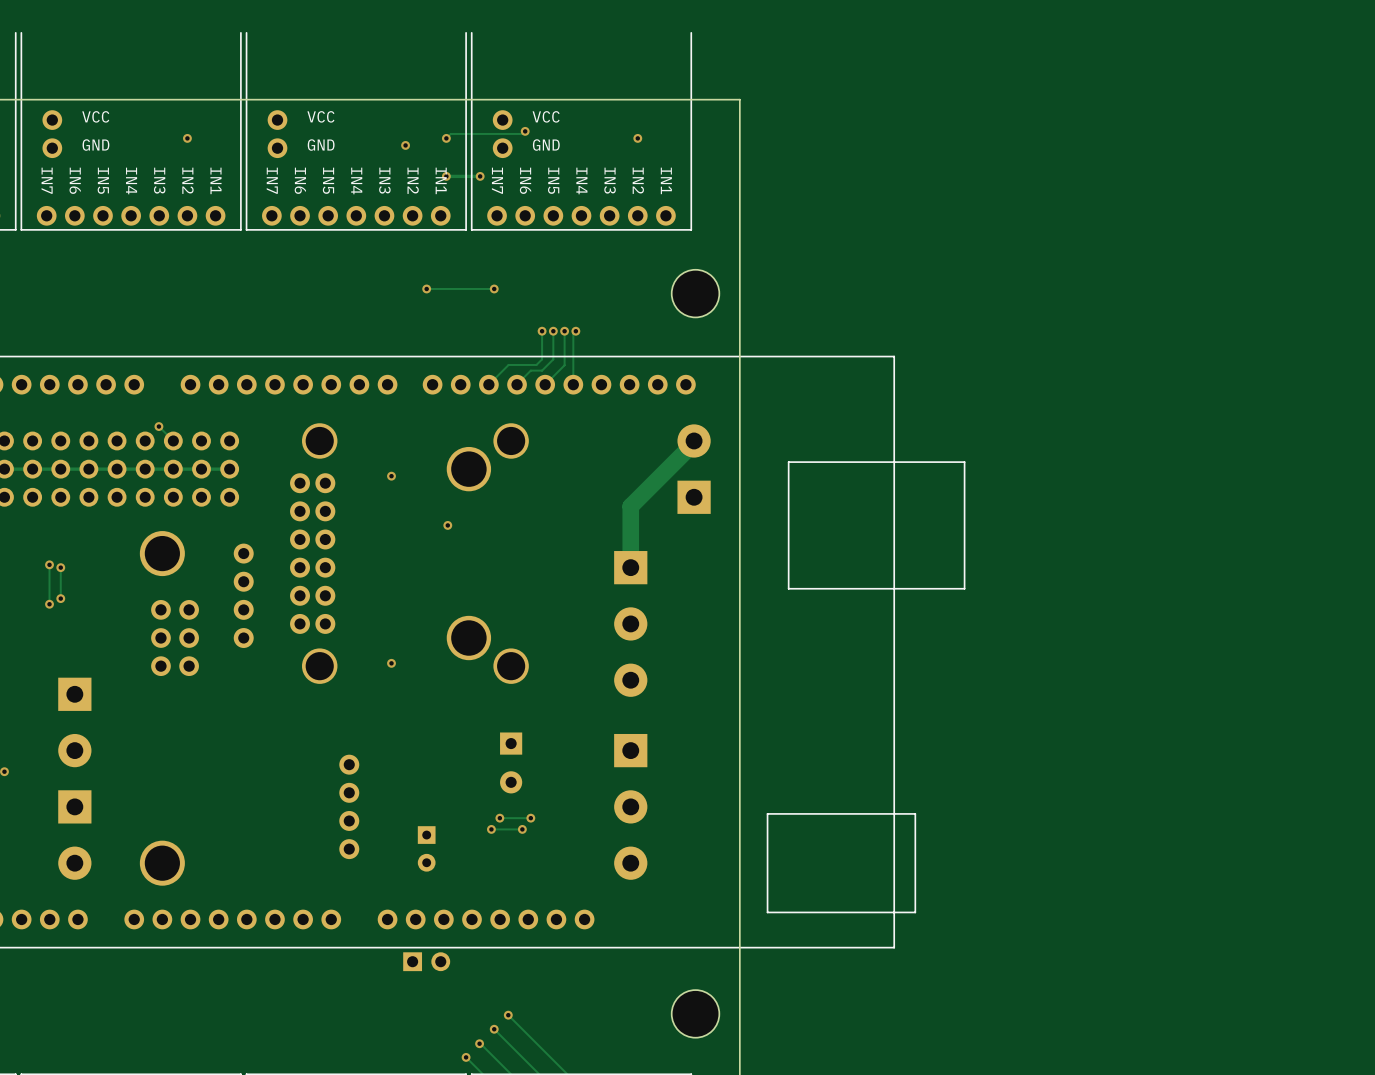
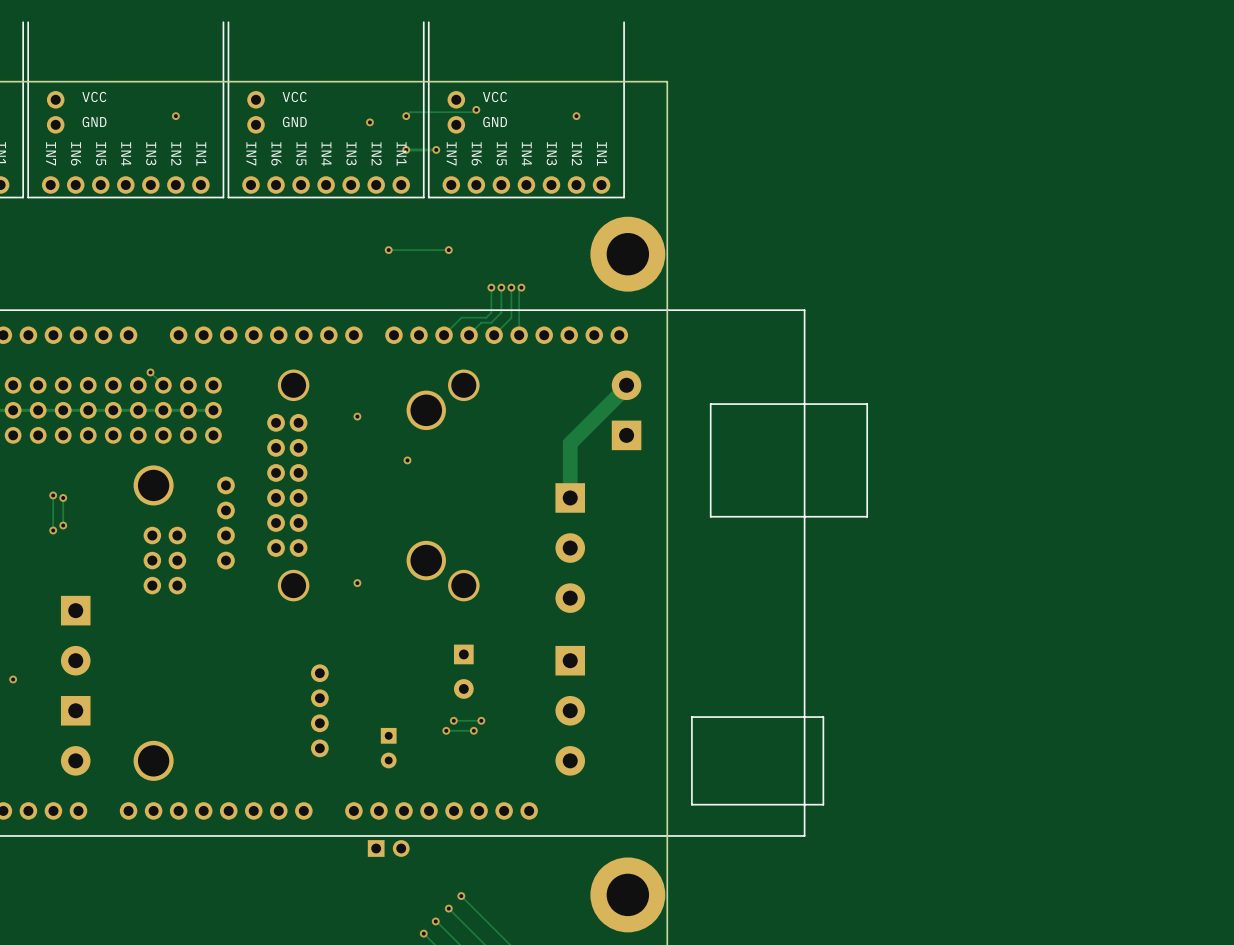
part footprint: [671, 269, 720, 318] -> [590, 216, 666, 292]
part footprint: [671, 990, 720, 1038] -> [590, 857, 666, 933]

